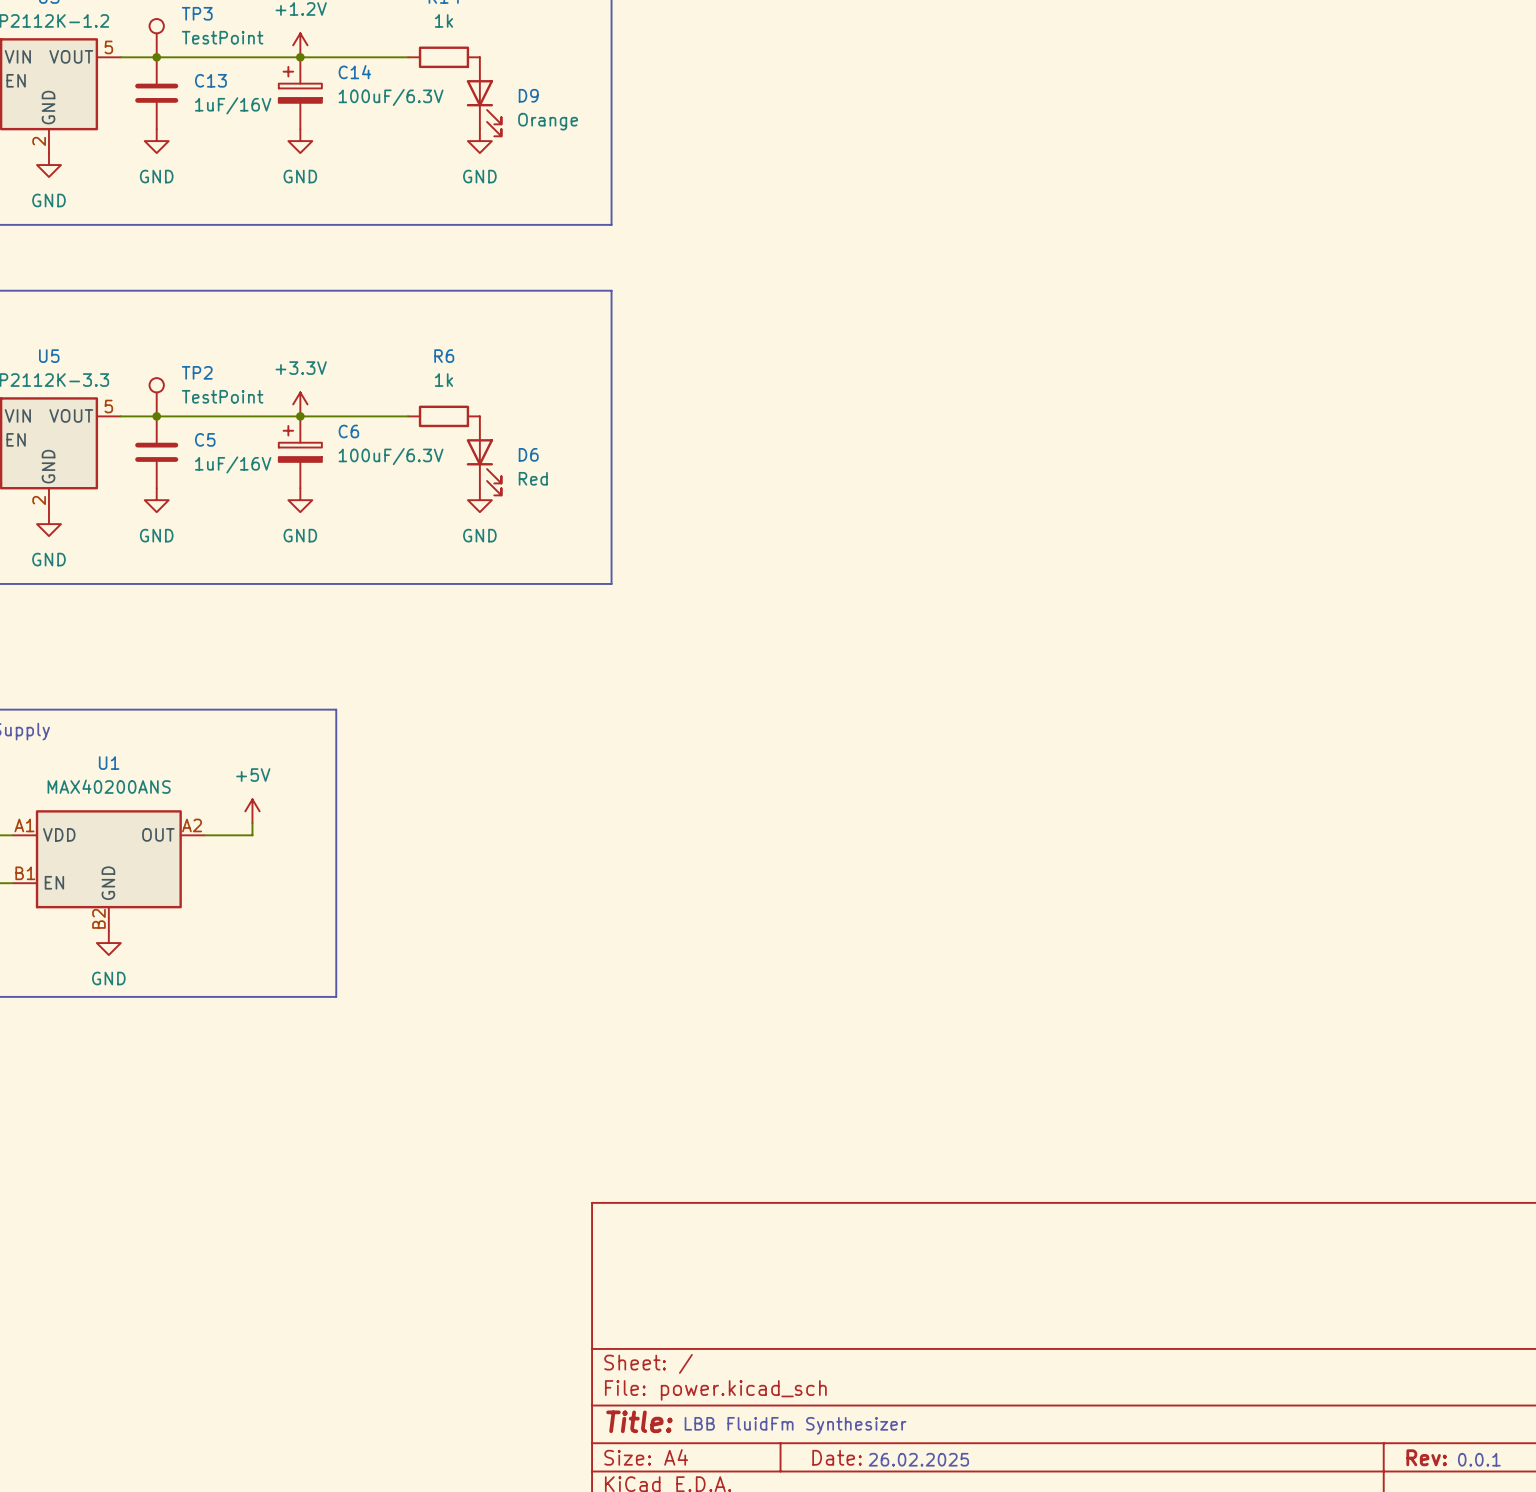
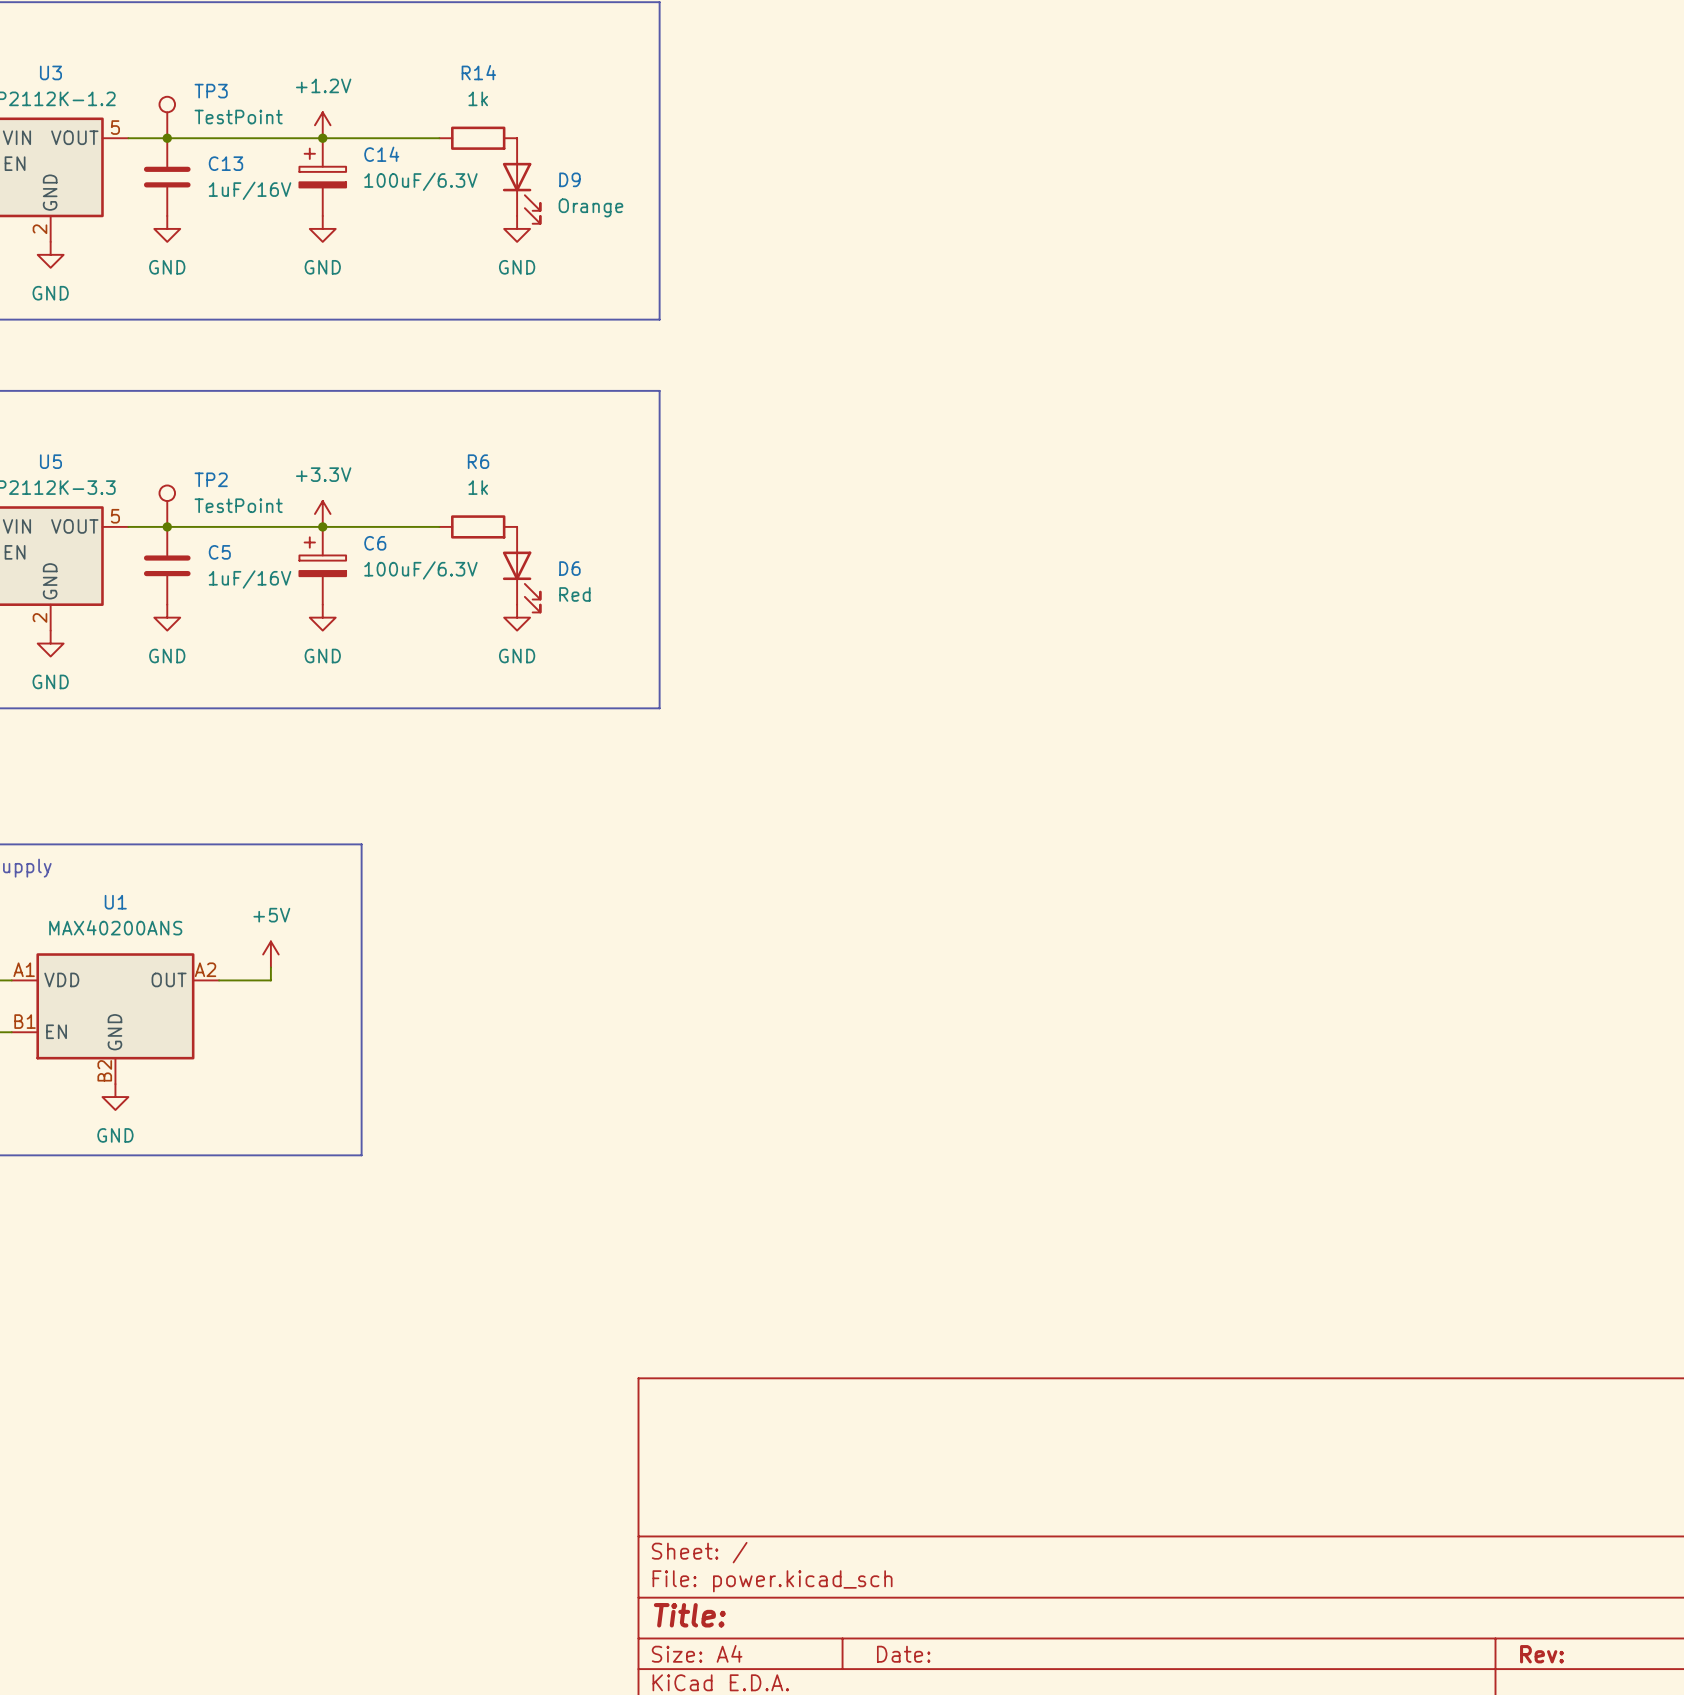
text: LBB FluidFm Synthesizer (795, 1425) -> none
text: 26.02.2025 (918, 1459) -> none
text: 0.0.1 (1479, 1459) -> none

